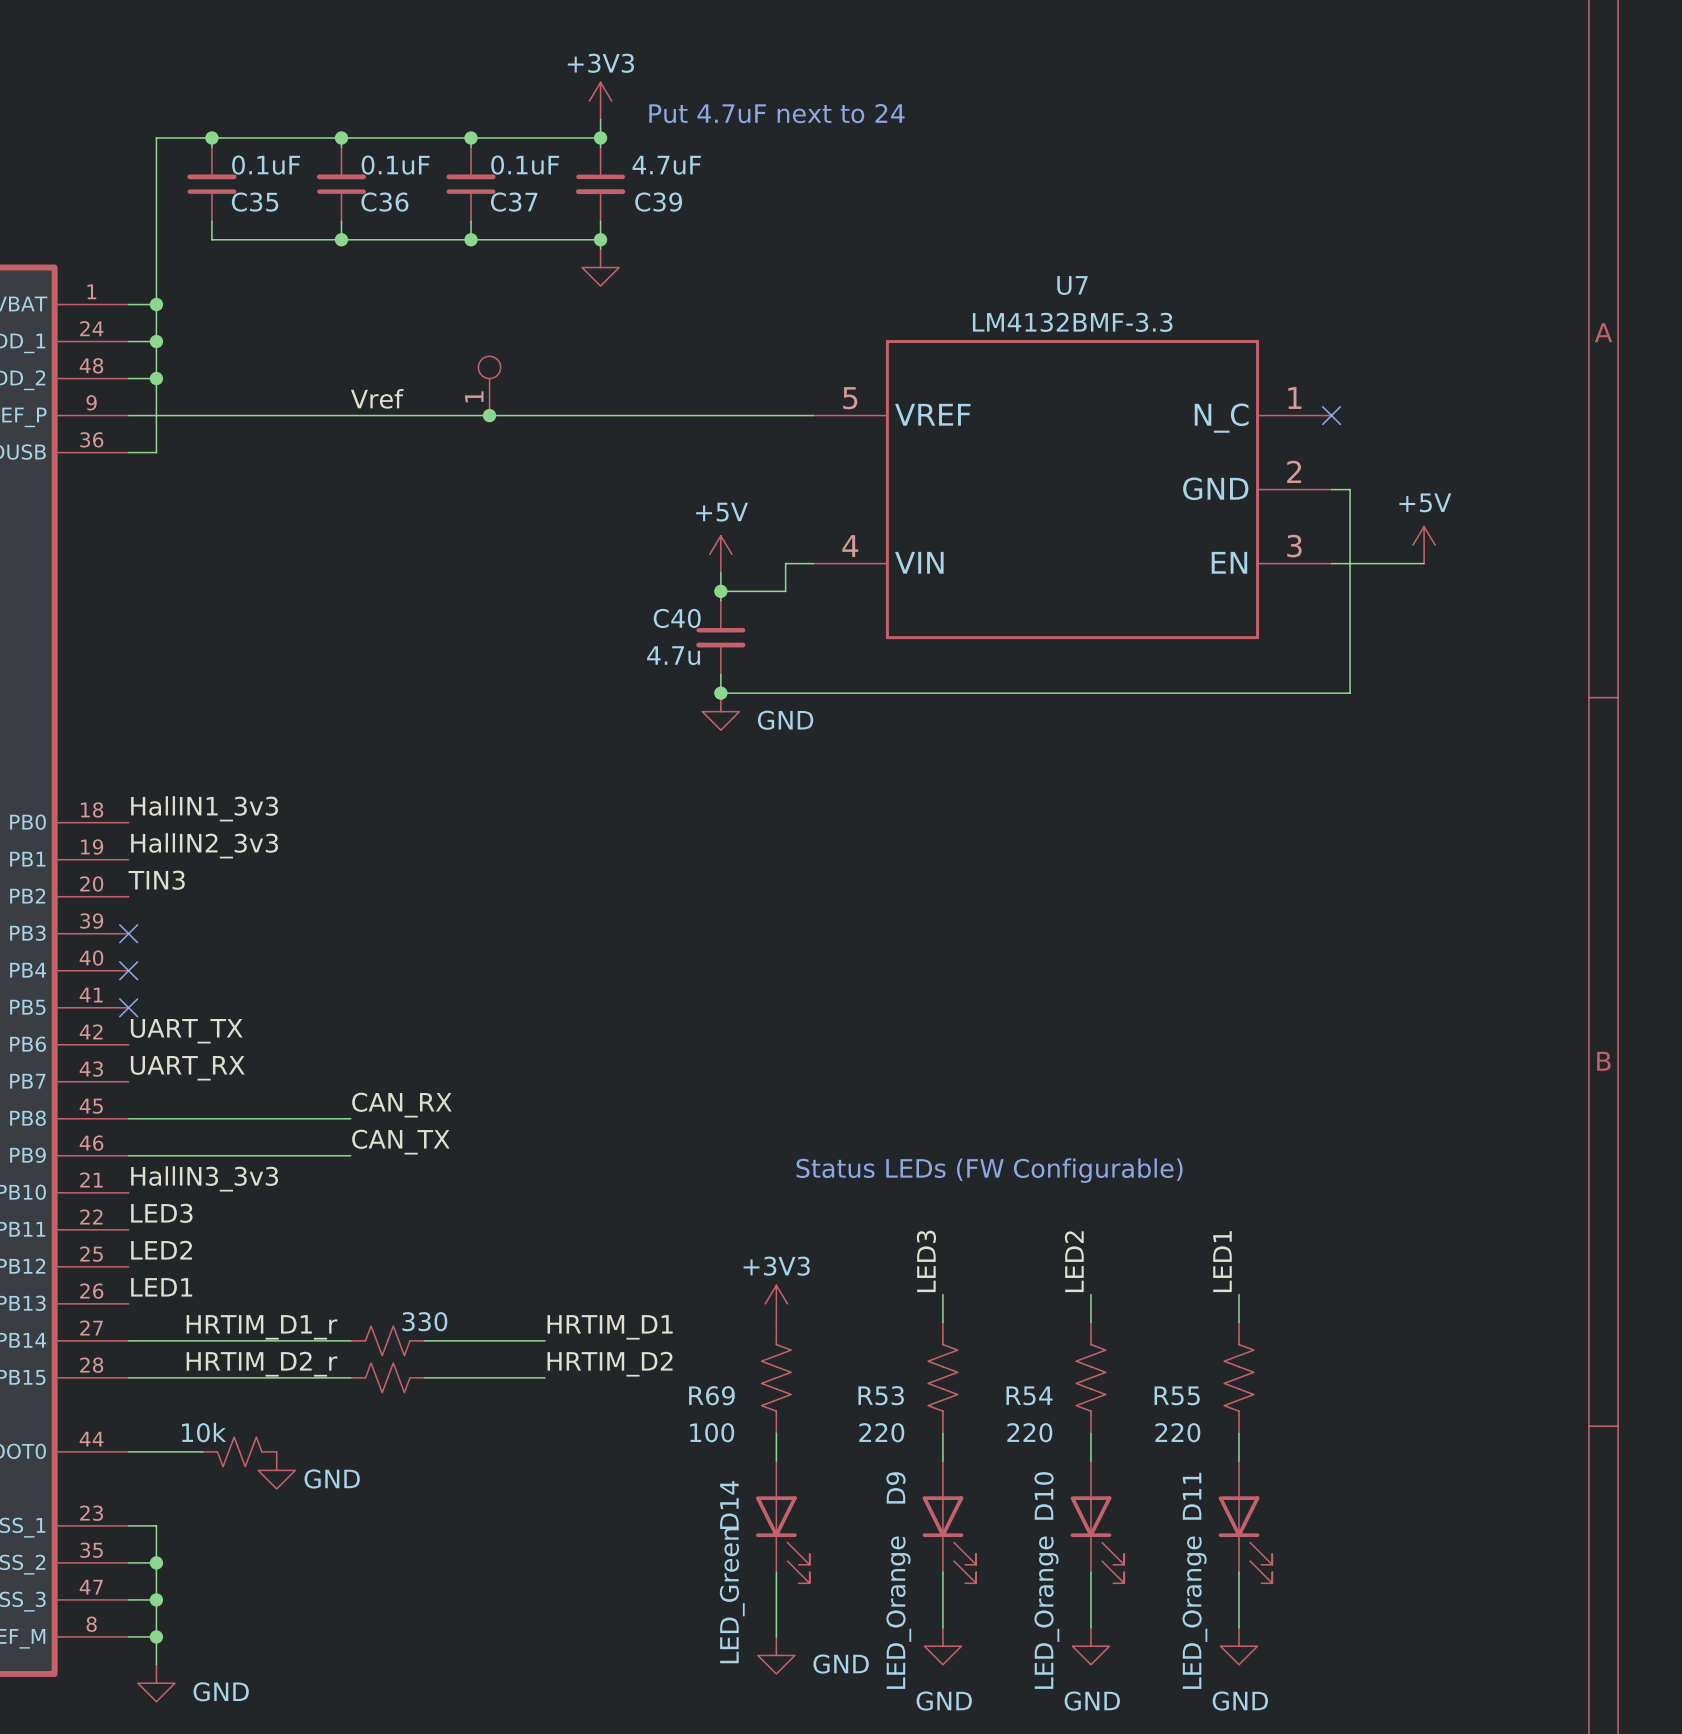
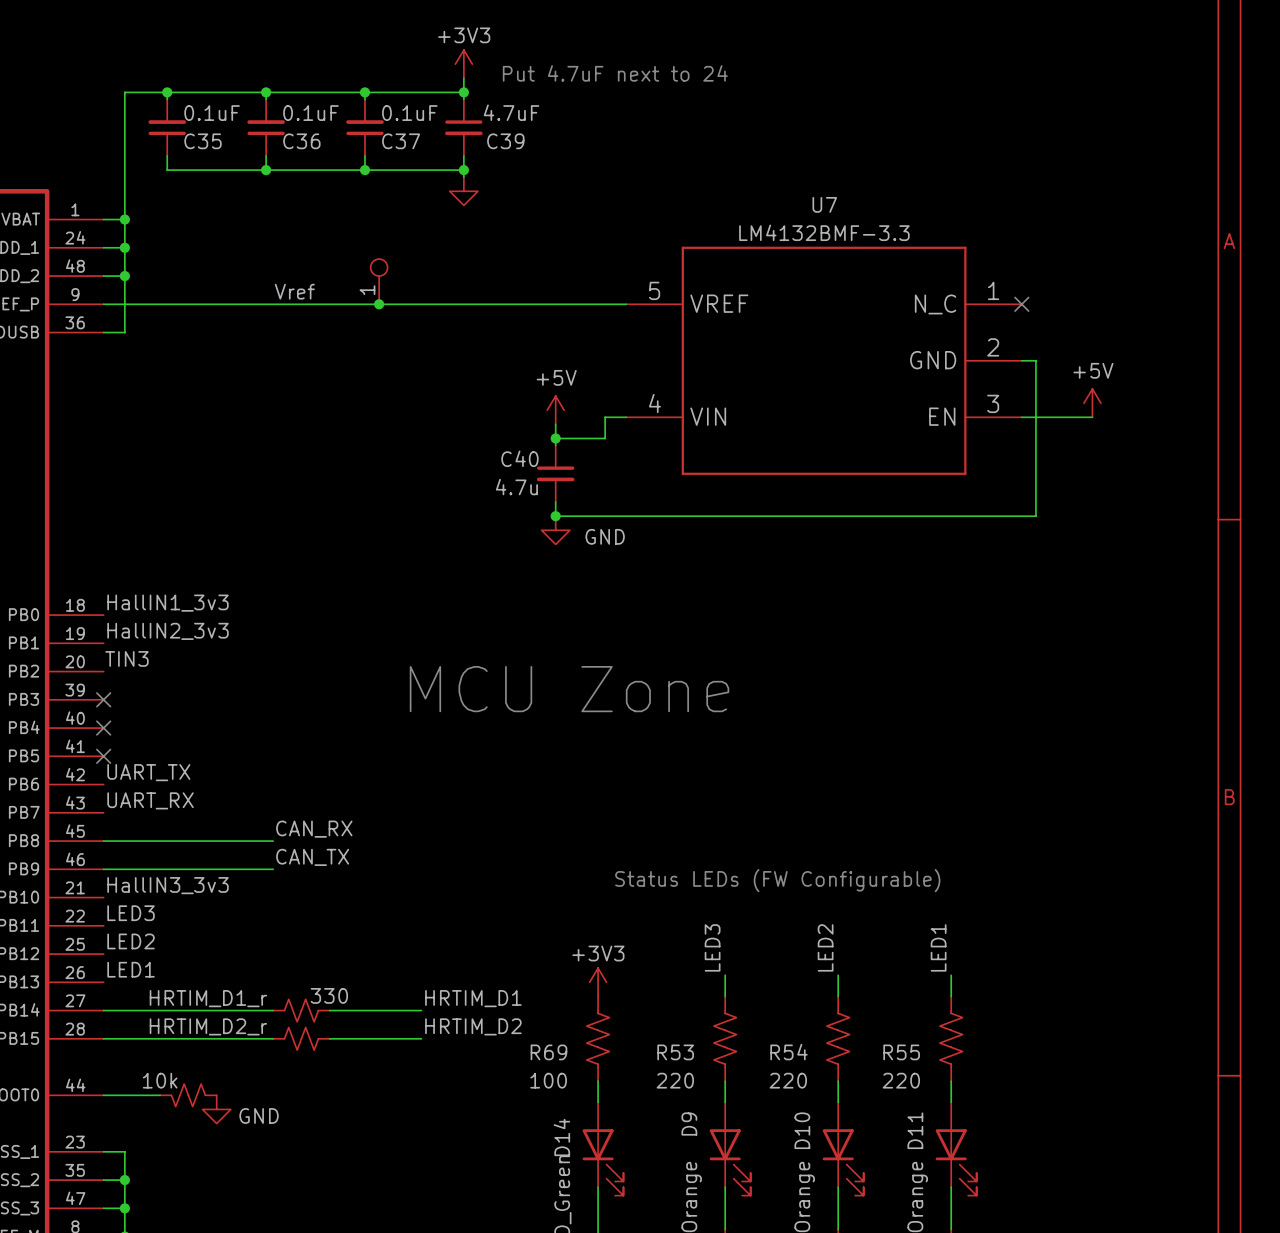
text: none -> MCU Zone (569, 689)

